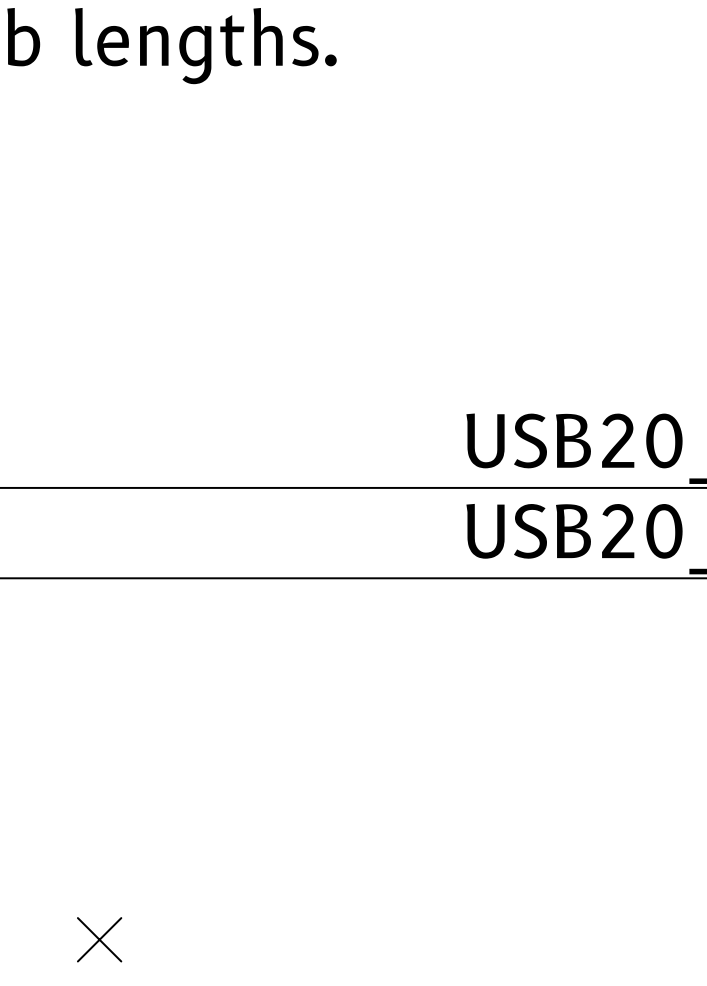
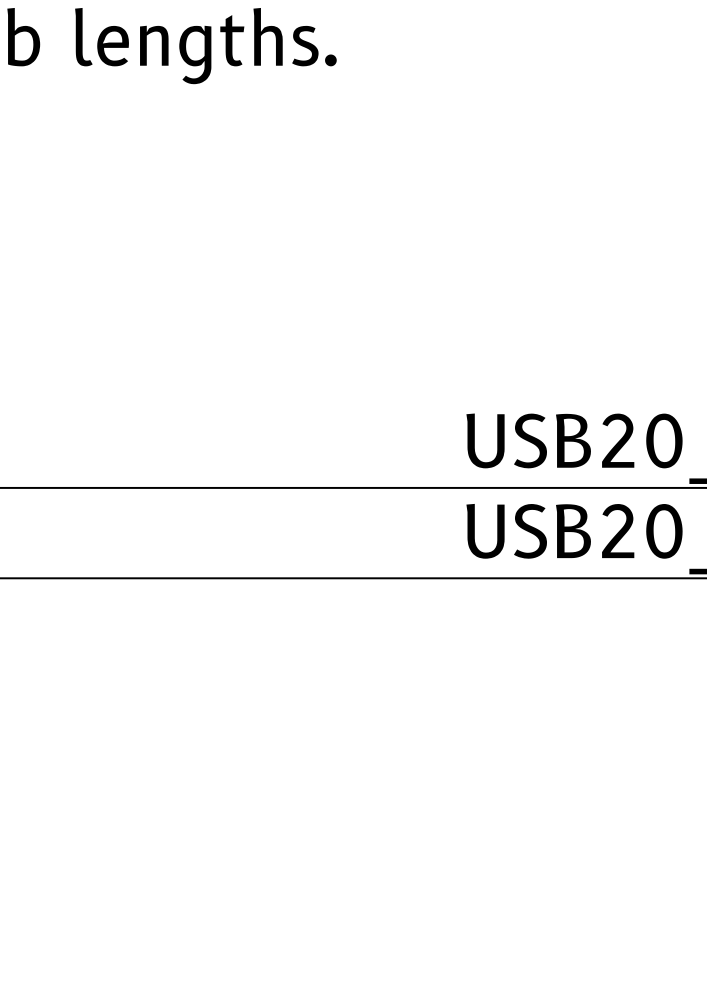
no-connect mark: (99, 939) -> none

